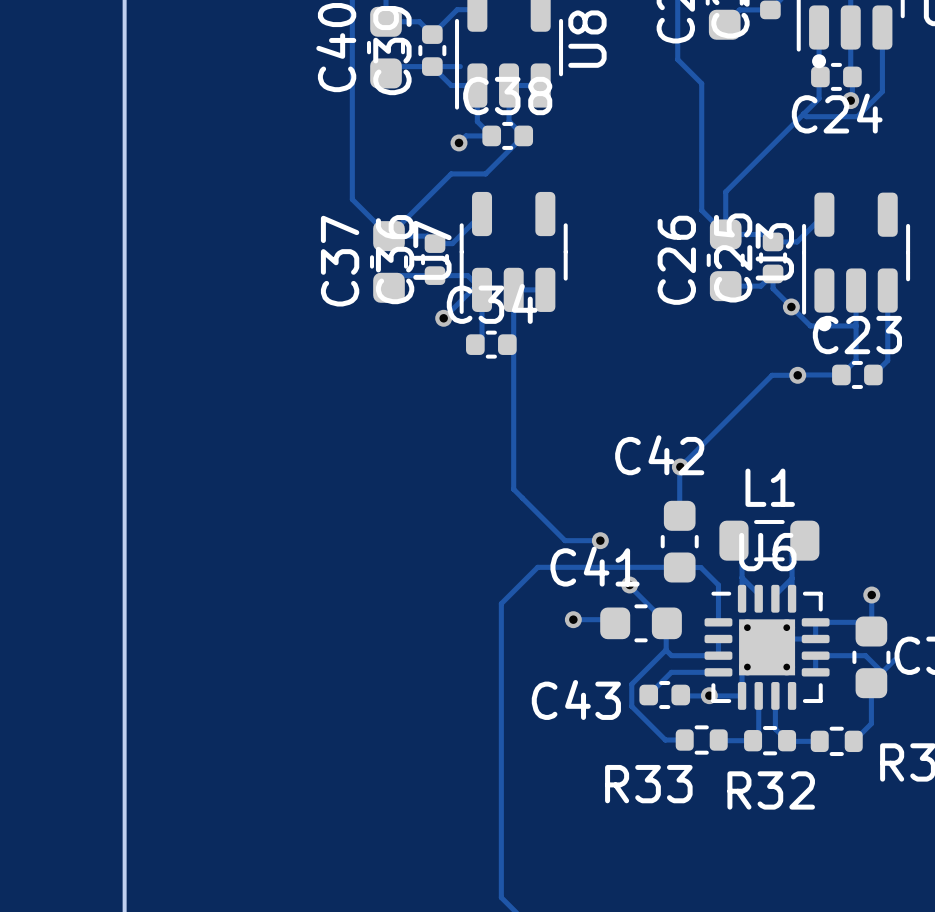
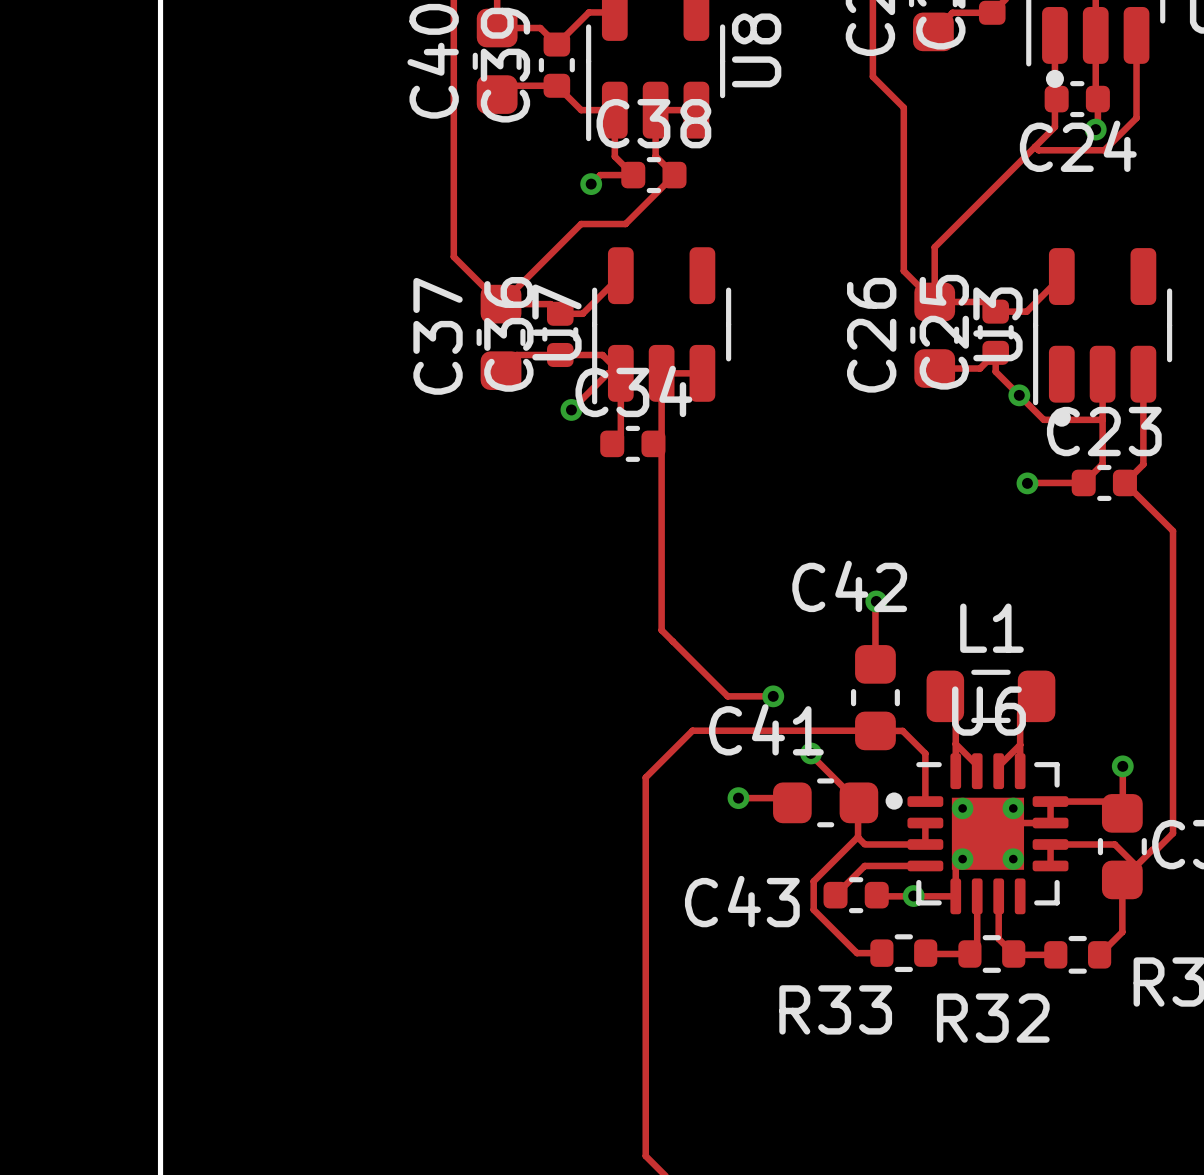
track: (432, 66) (460, 66) -> none
track: none -> (1124, 482) (1173, 531) (1173, 833) (1156, 849) (1152, 849)
track: (797, 375) (772, 375) (680, 466) -> none
U6 footprint: [704, 584, 830, 710] -> [885, 753, 1069, 915]

